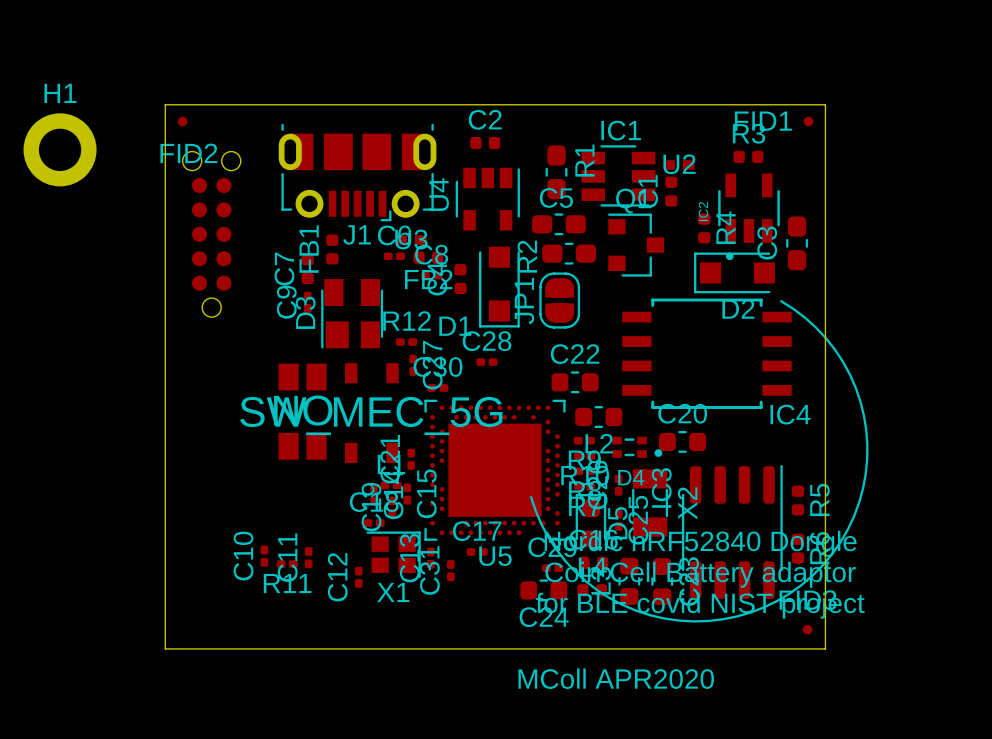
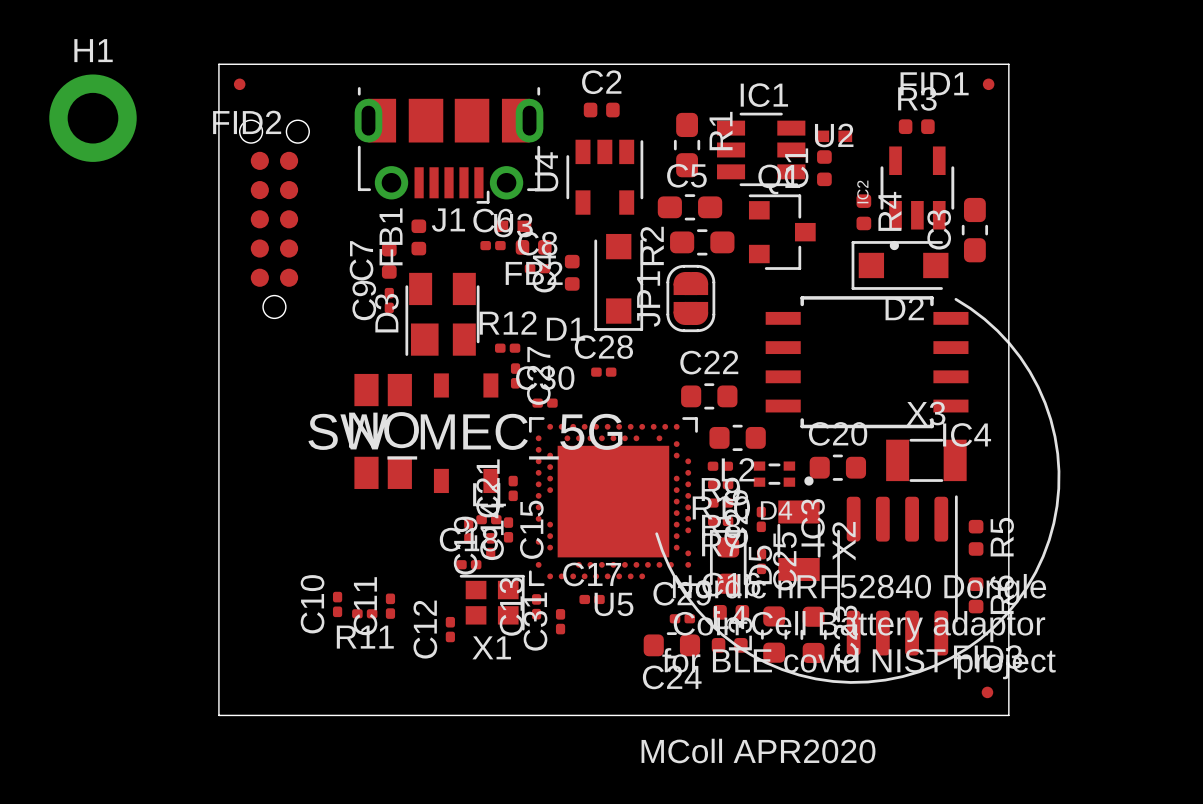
X3: none -> (926, 460)

